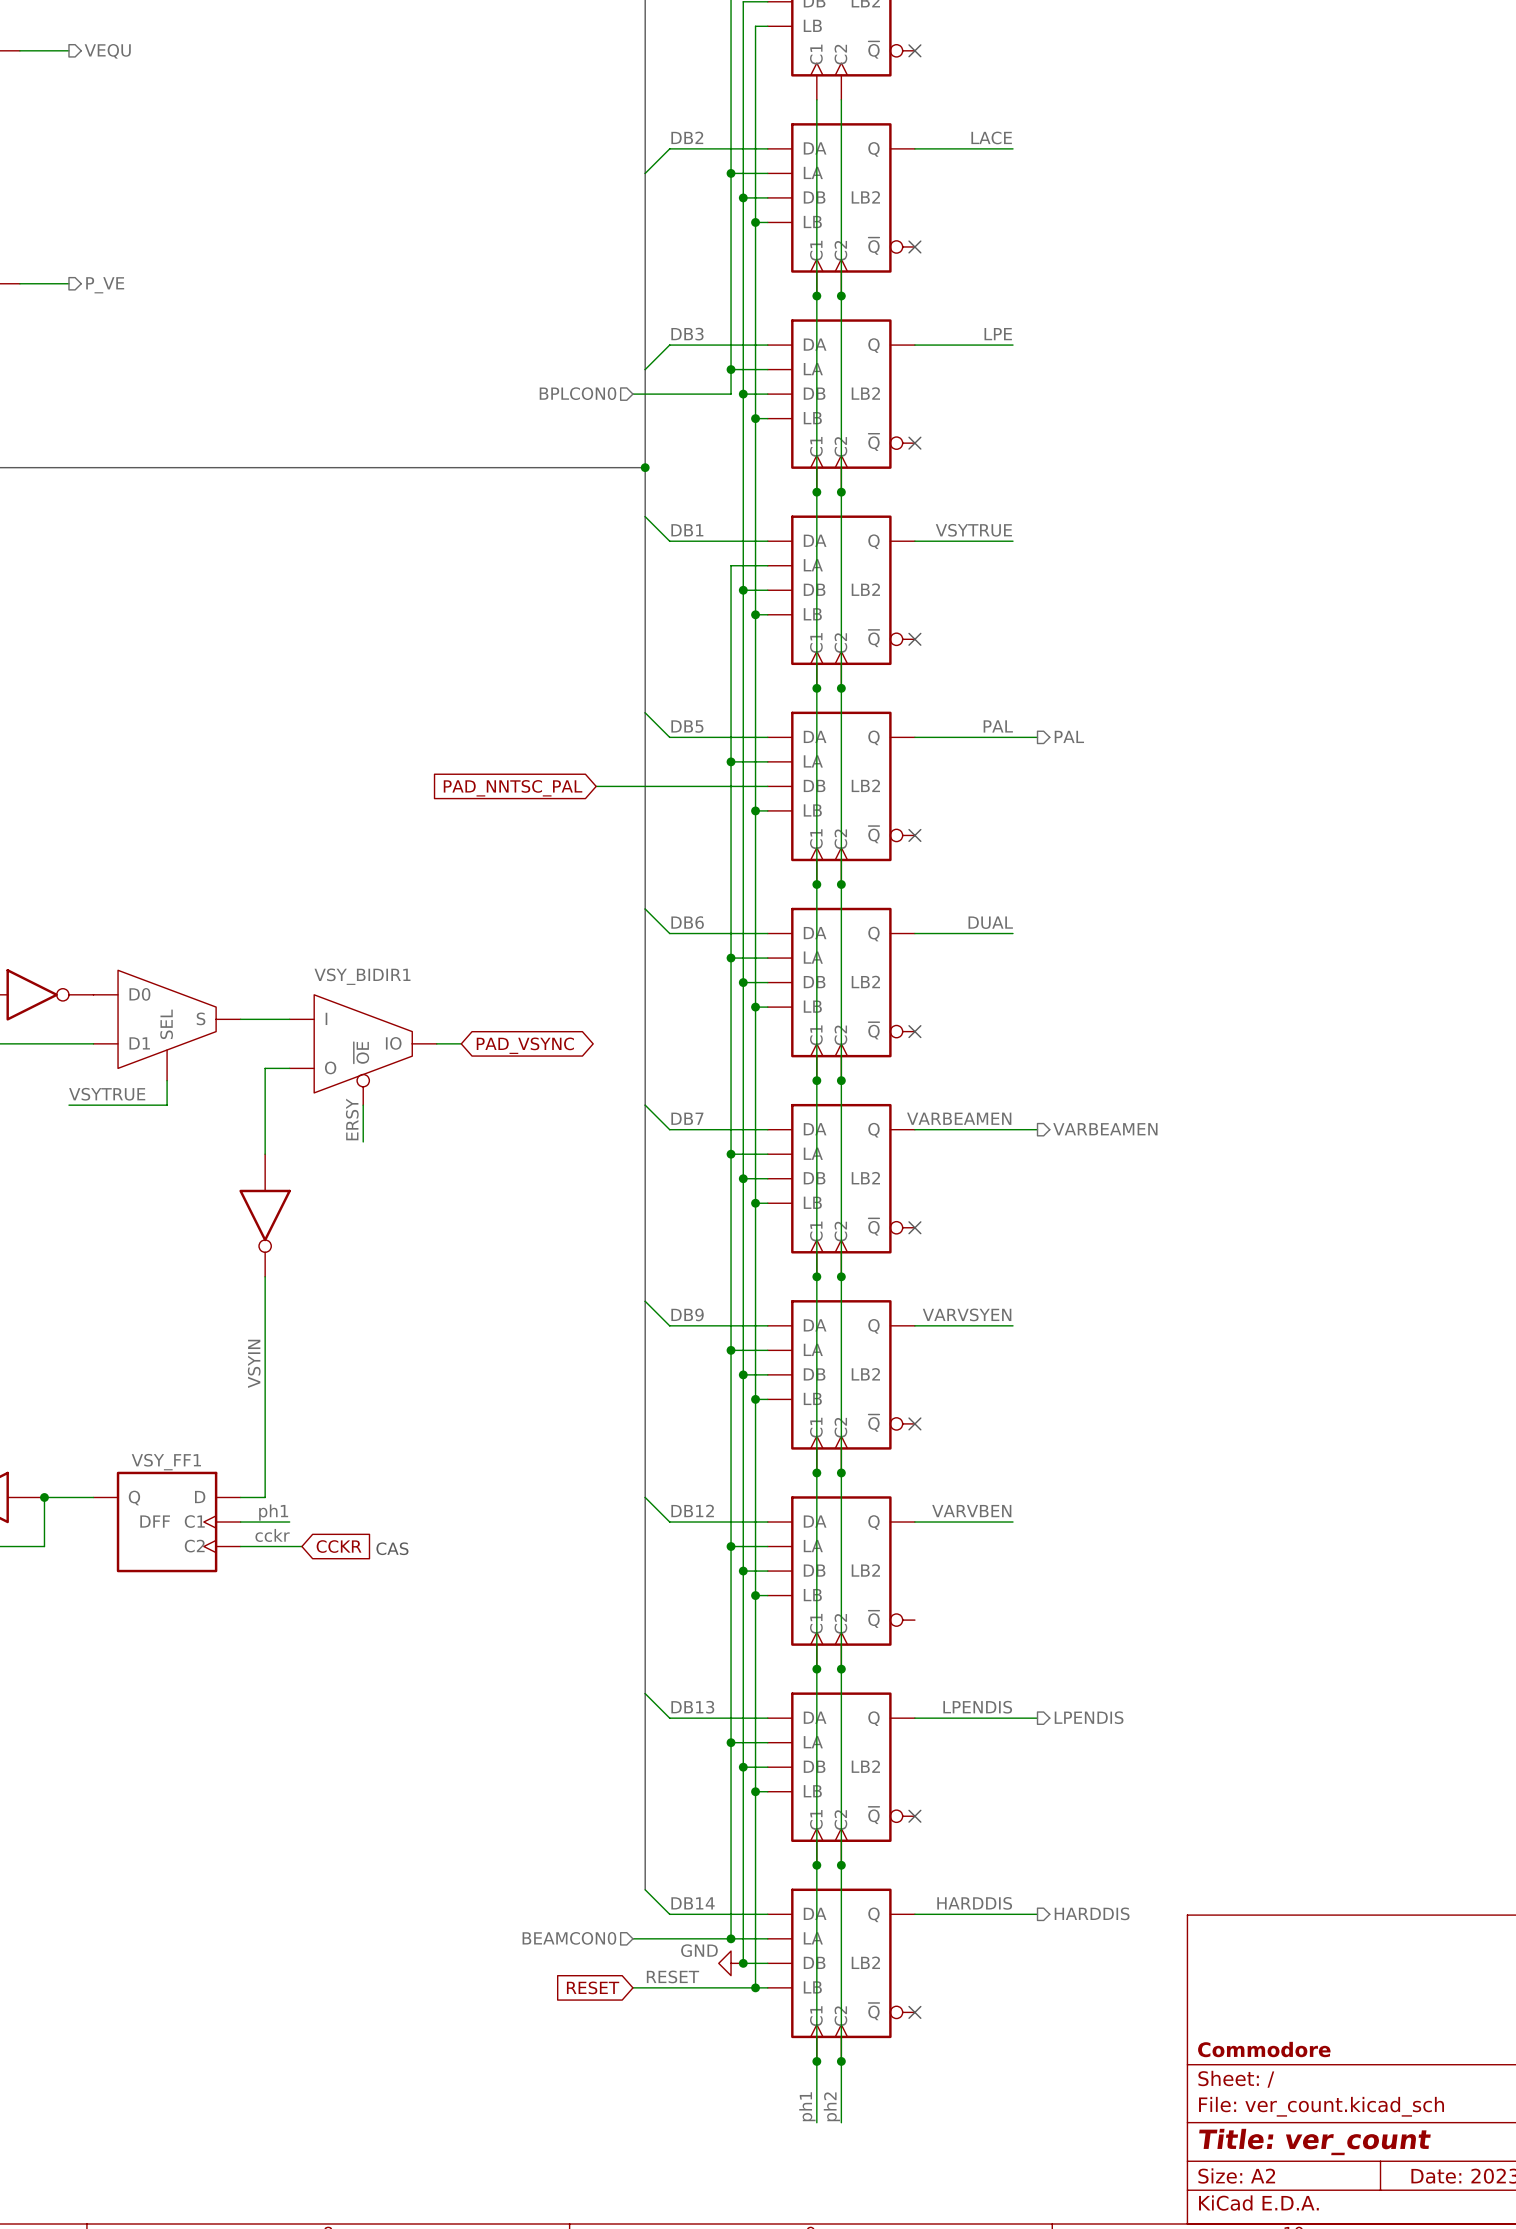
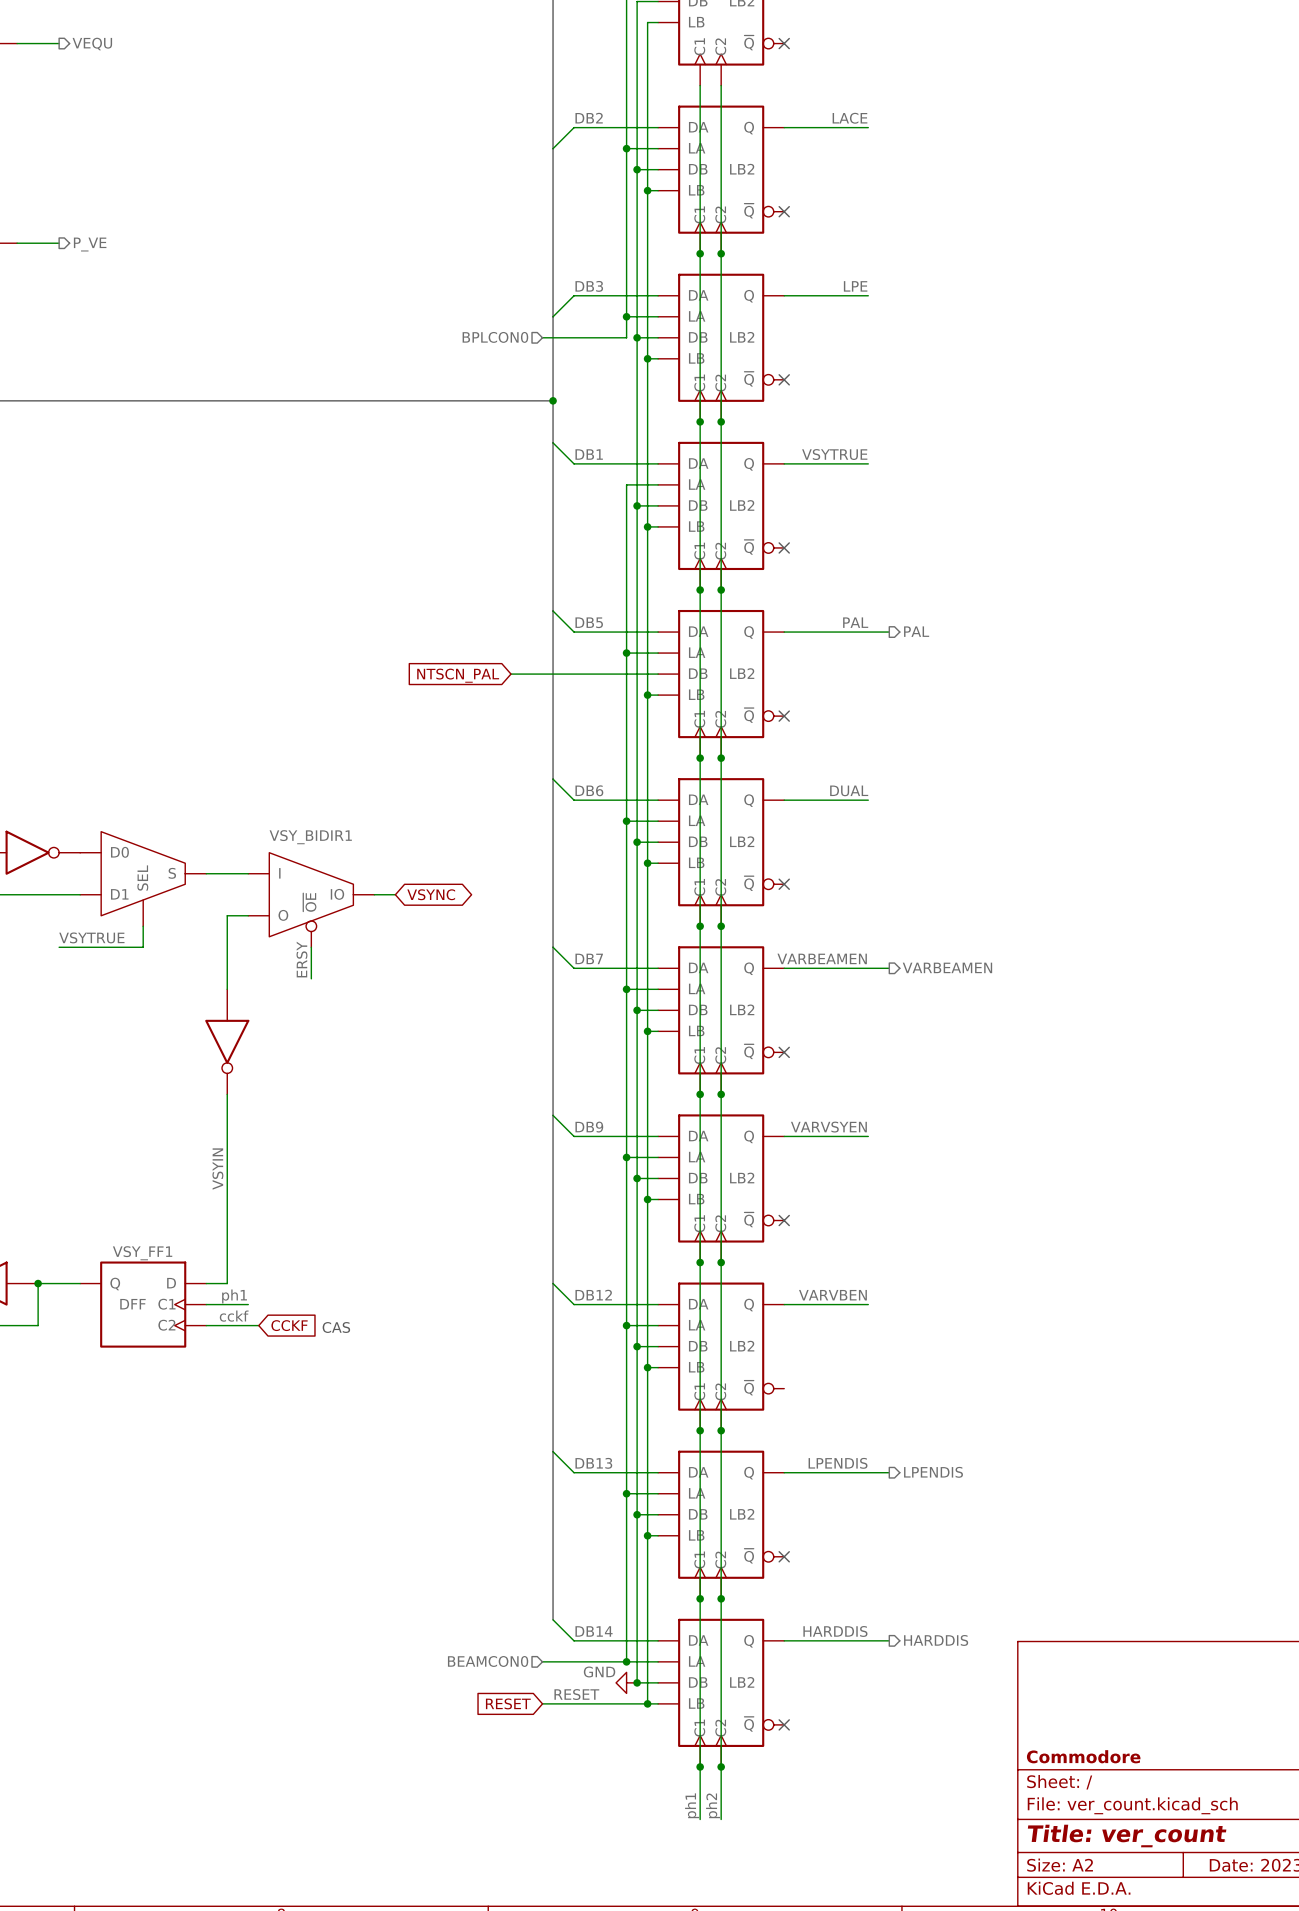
global label: PAD_NNTSC_PAL (513, 788) -> NTSCN_PAL (458, 675)
global label: PAD_VSYNC (525, 1045) -> VSYNC (431, 894)
label: cckr (272, 1535) -> cckf (234, 1316)
global label: CCKR (339, 1546) -> CCKF (289, 1325)

